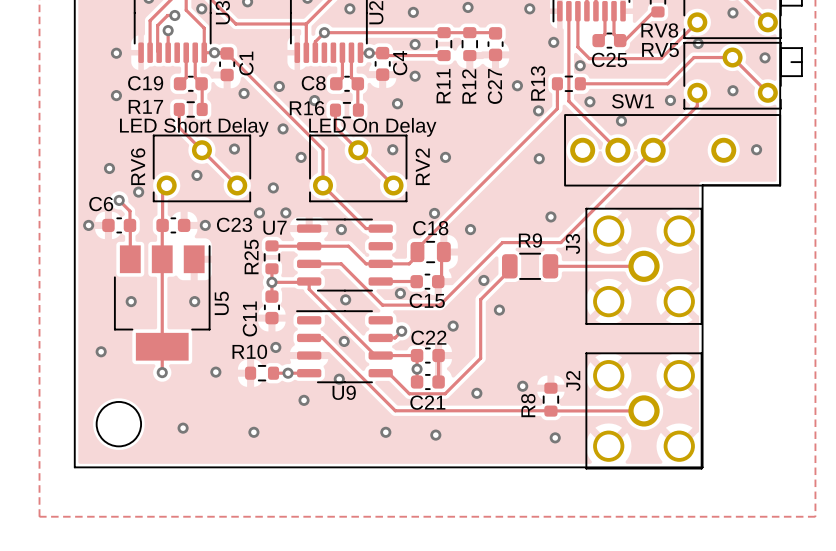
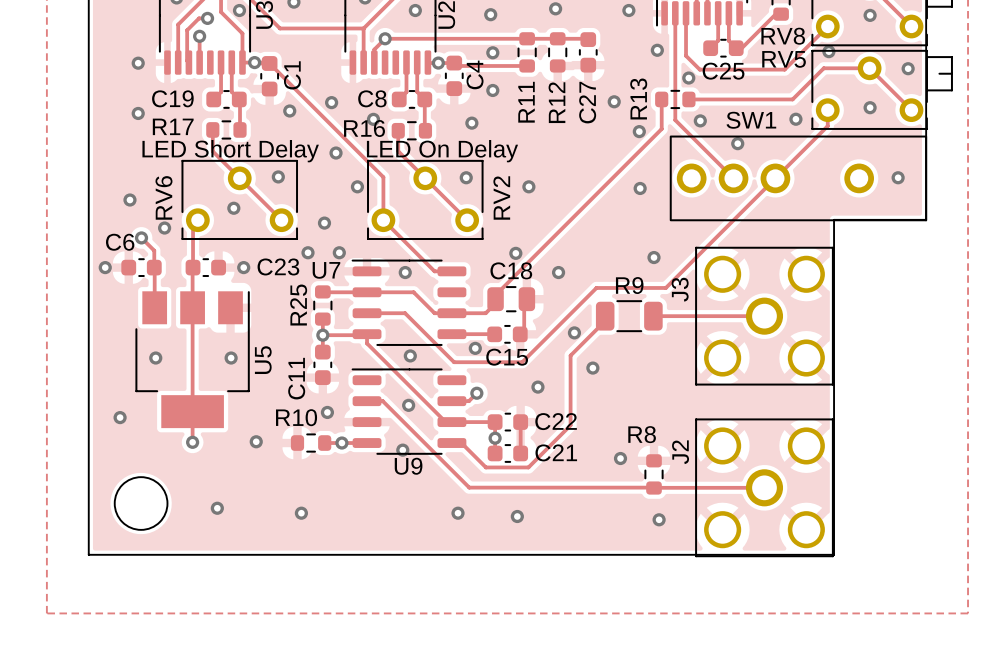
C22 name position: C22 (428, 337) -> C22 (556, 421)
via: (476, 393) -> none
via: (304, 400) -> none
C21 name position: C21 (427, 402) -> C21 (556, 452)
R8 name rotation: 0° (528, 405) -> 90° clockwise (642, 434)
R8 name position: R8 (528, 405) -> R8 (642, 434)

